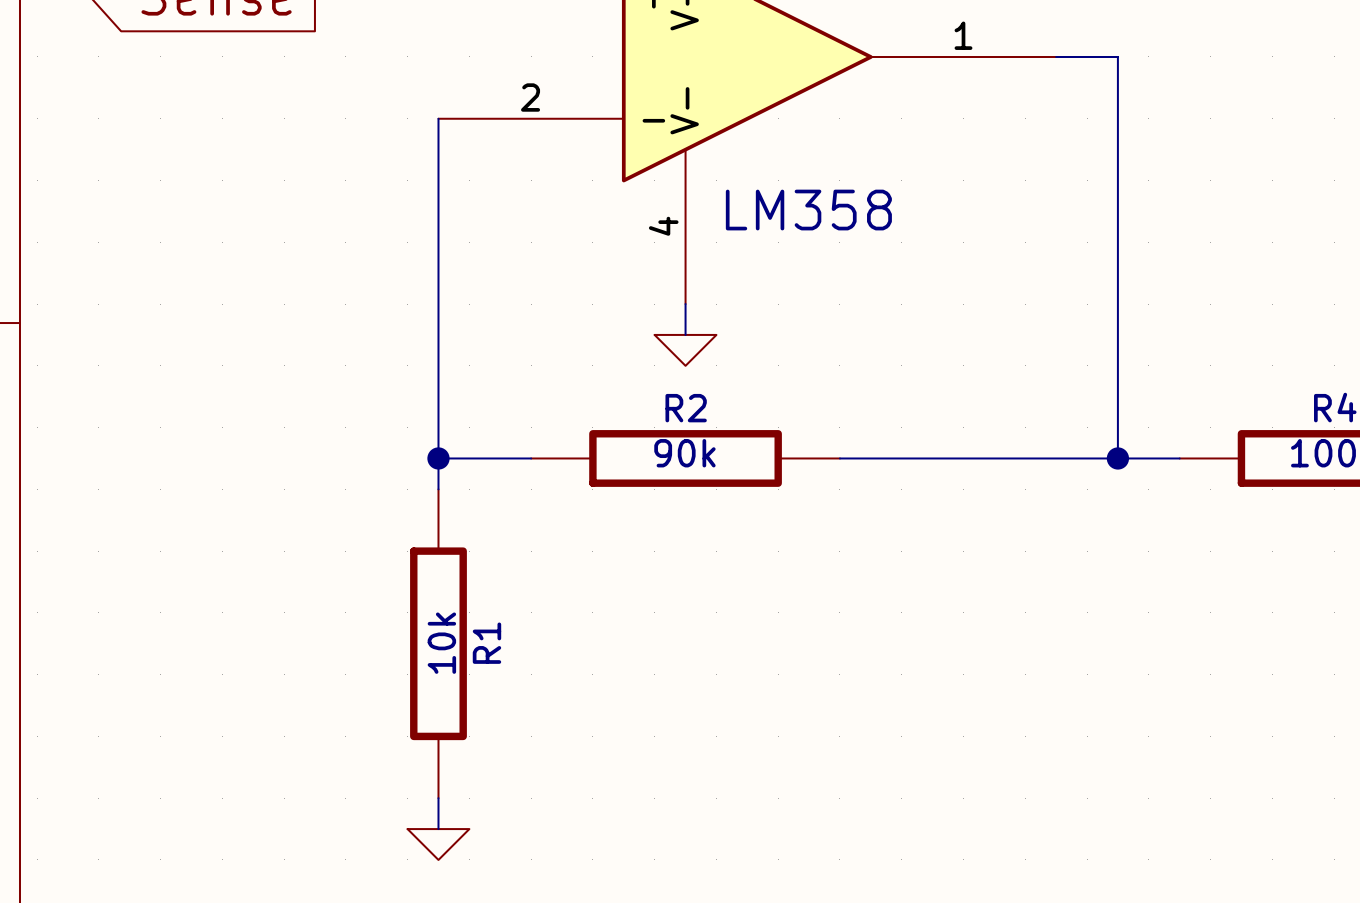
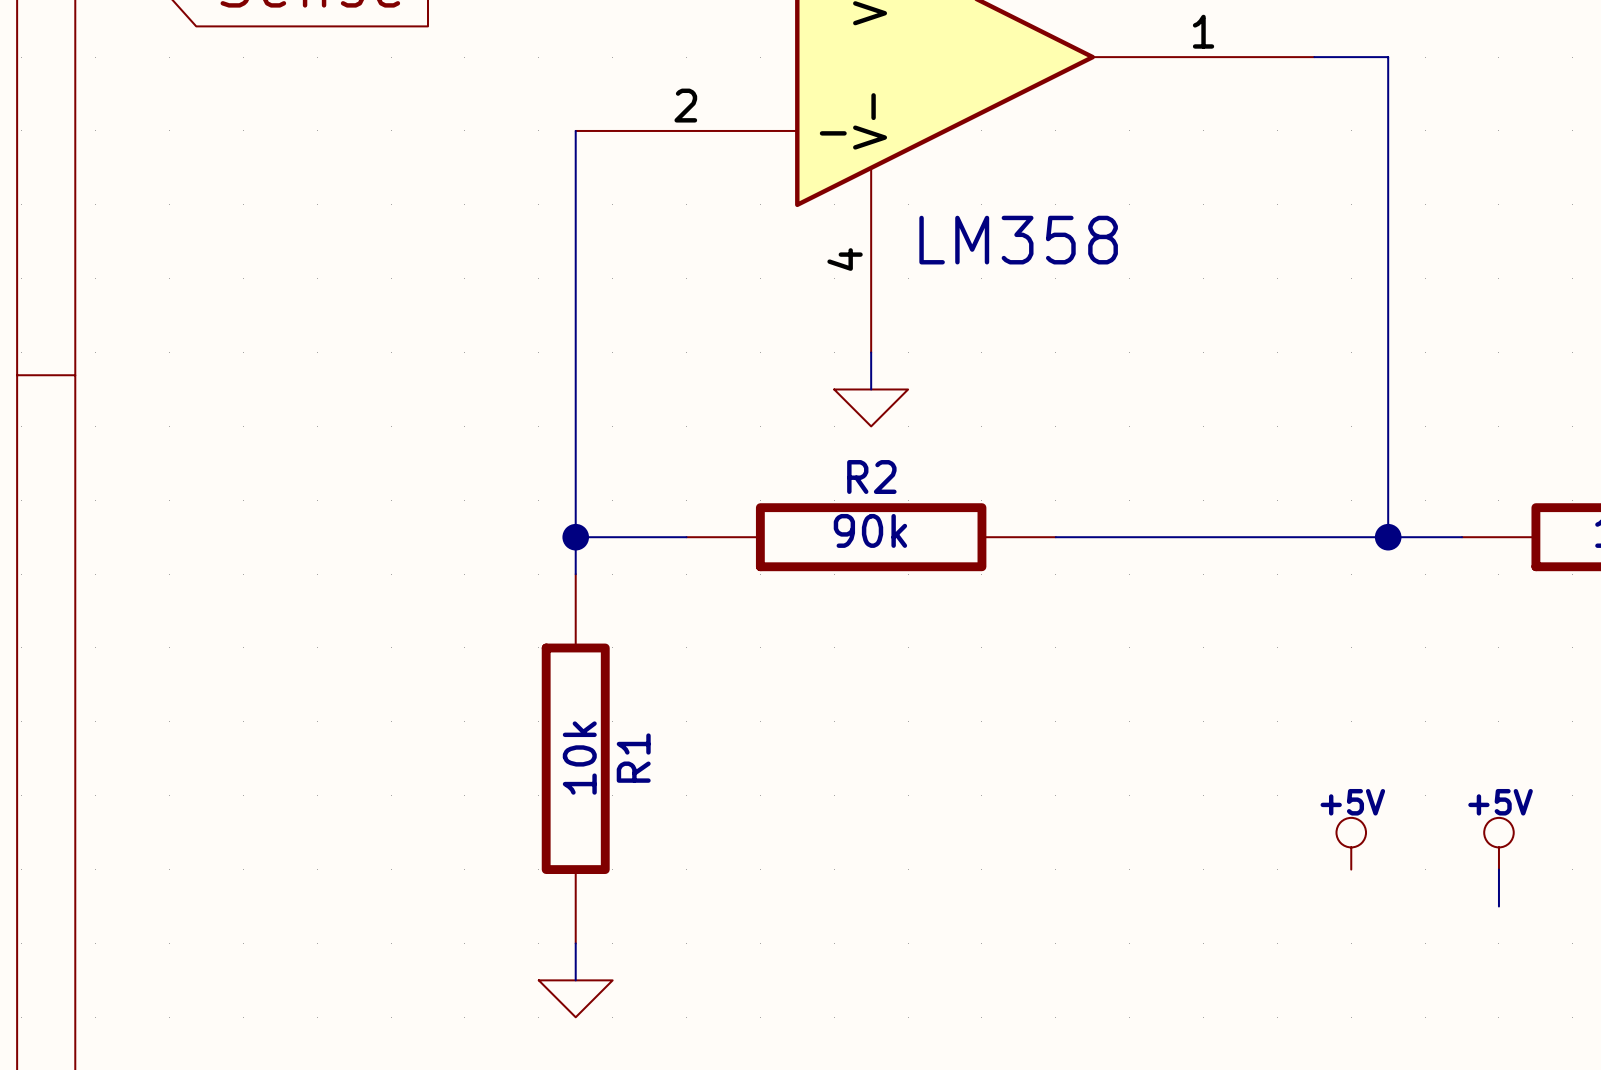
power symbol: none -> +5V (1351, 843)
power symbol: none -> +5V (1498, 843)
wire: none -> (1498, 869) (1498, 906)

